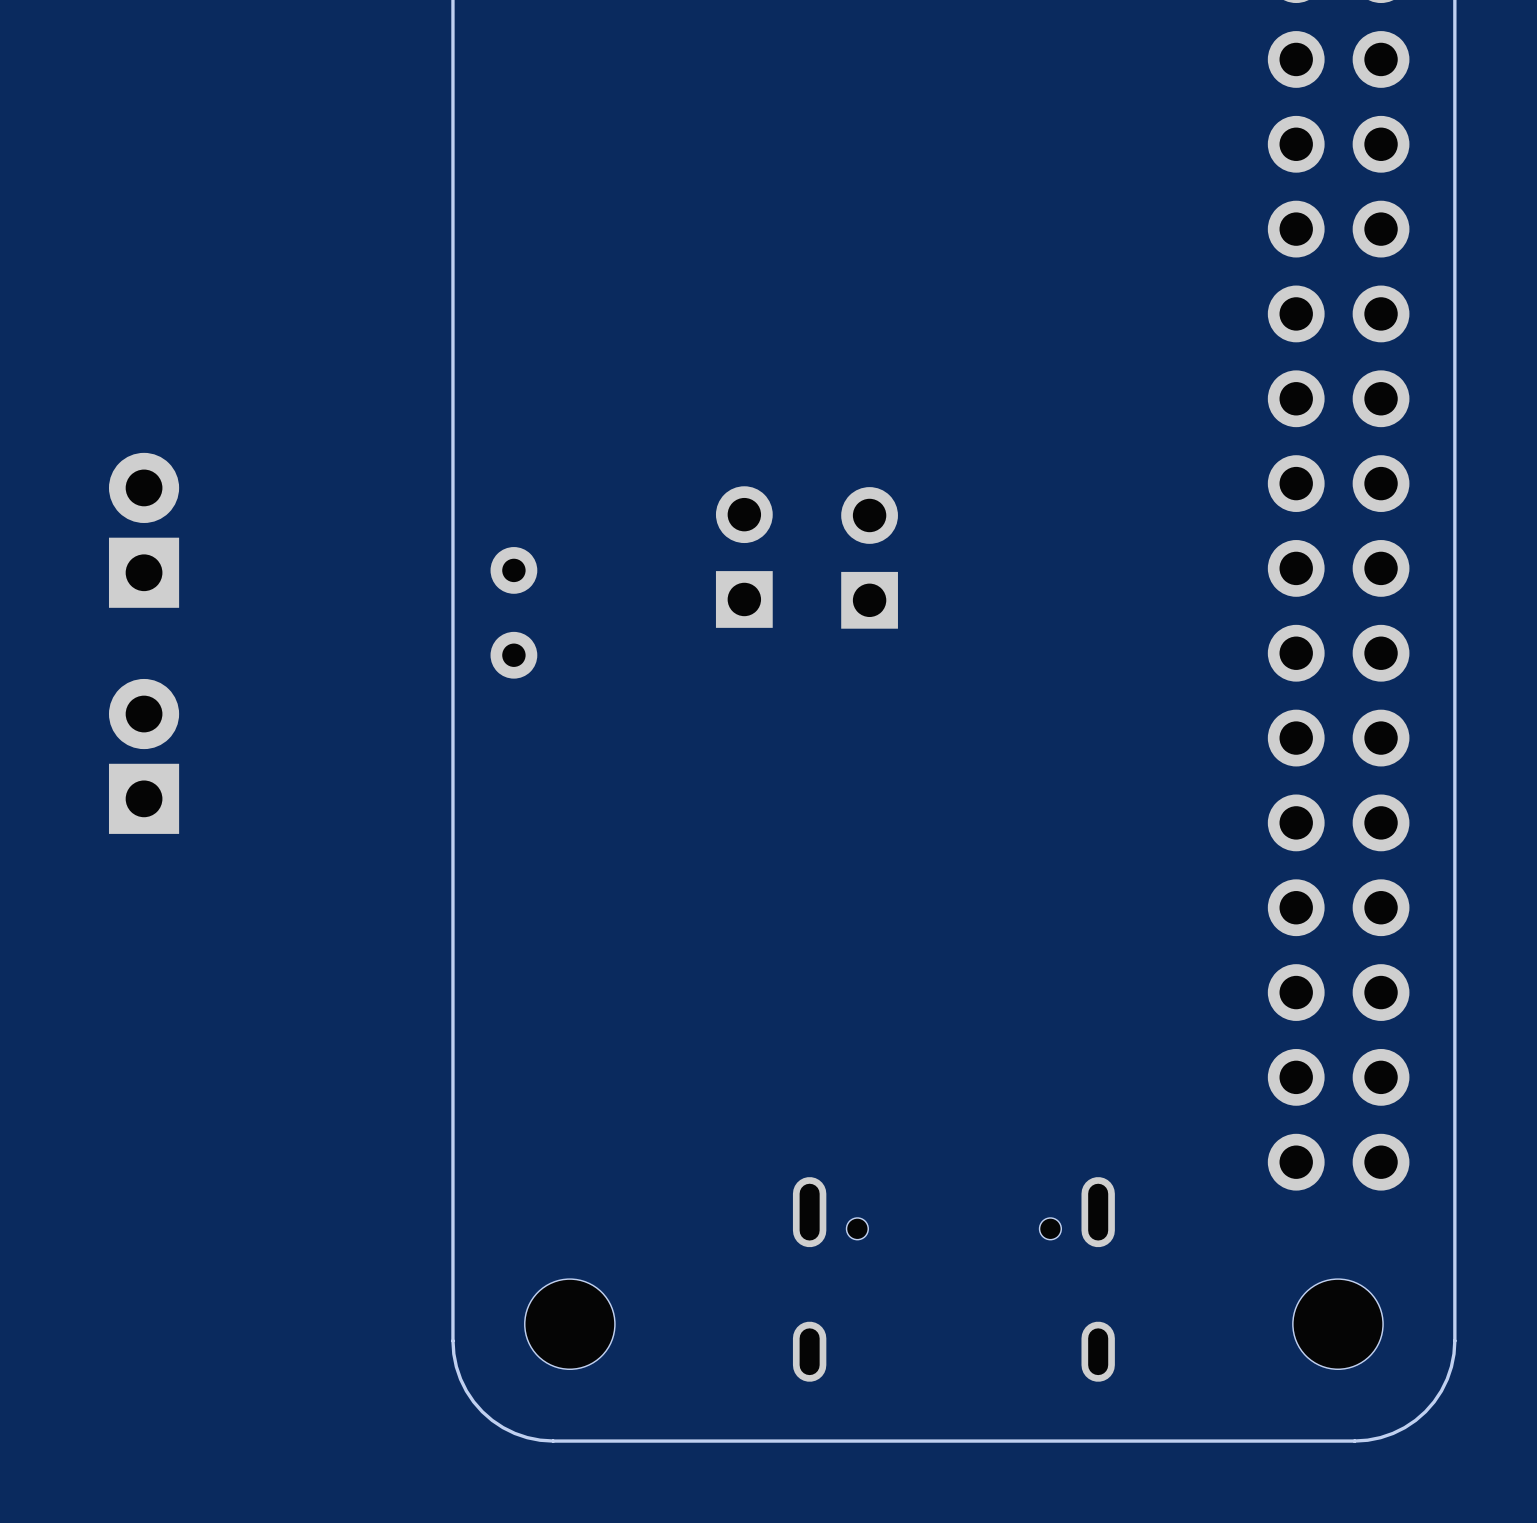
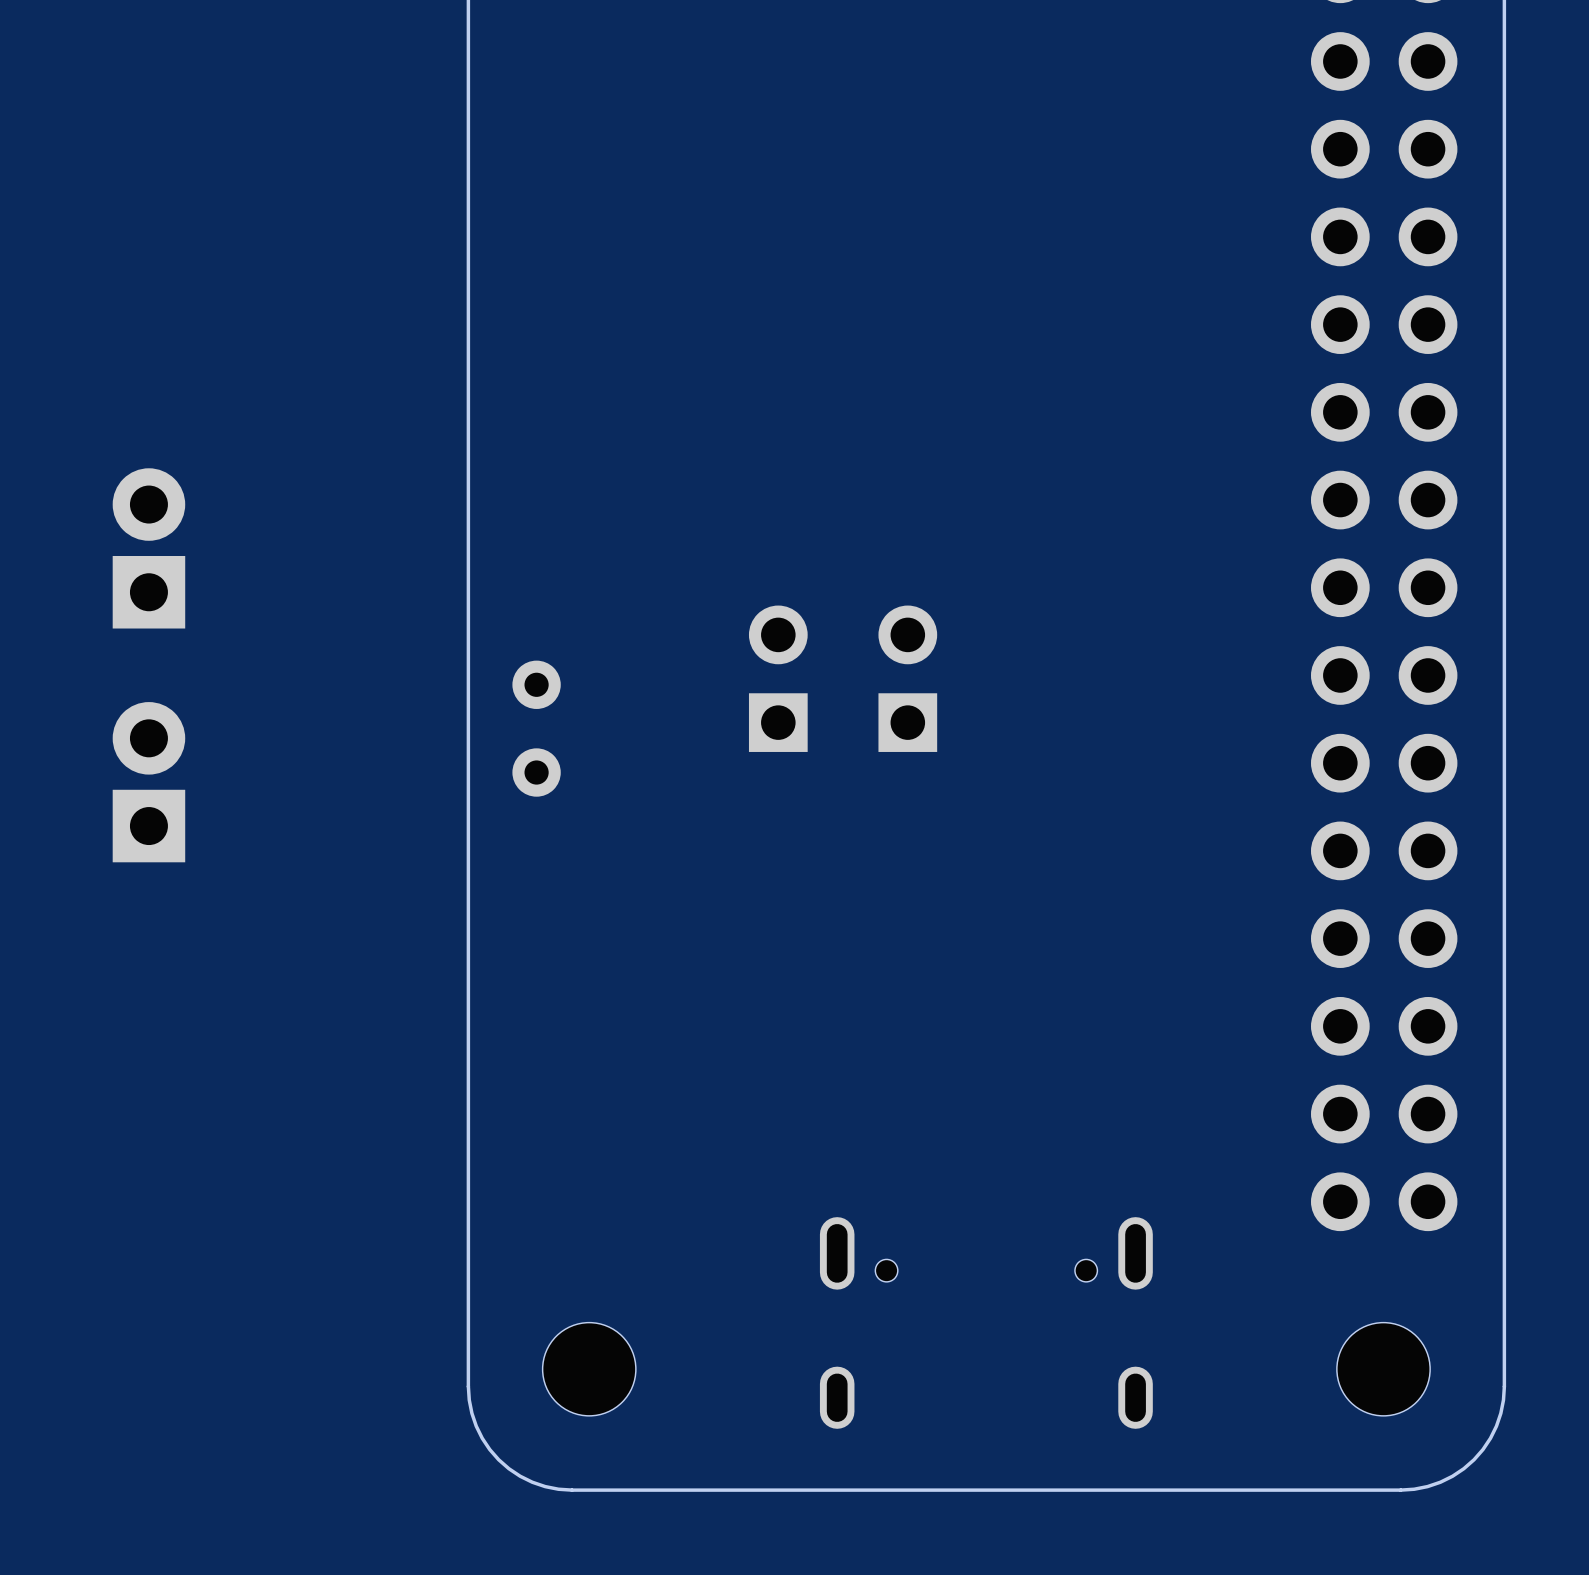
part: (744, 557) -> none
part: (869, 557) -> none
part position: (513, 612) -> (536, 728)
part: none -> (778, 678)
part: none -> (907, 678)

